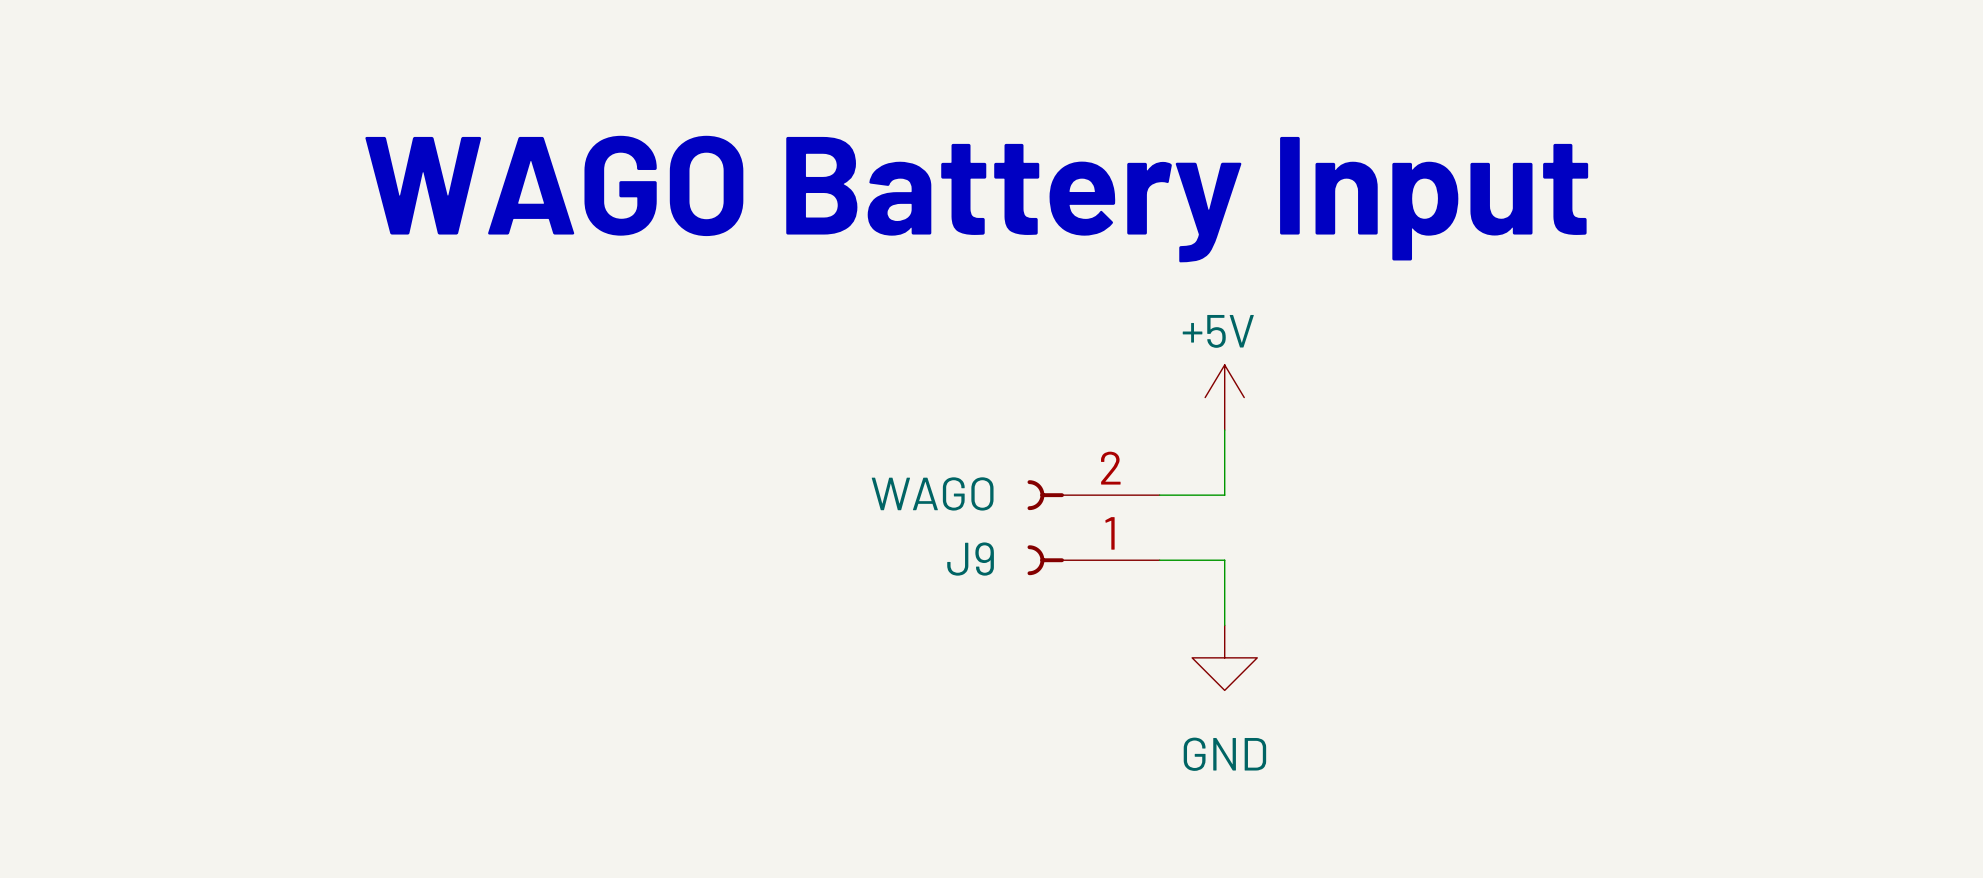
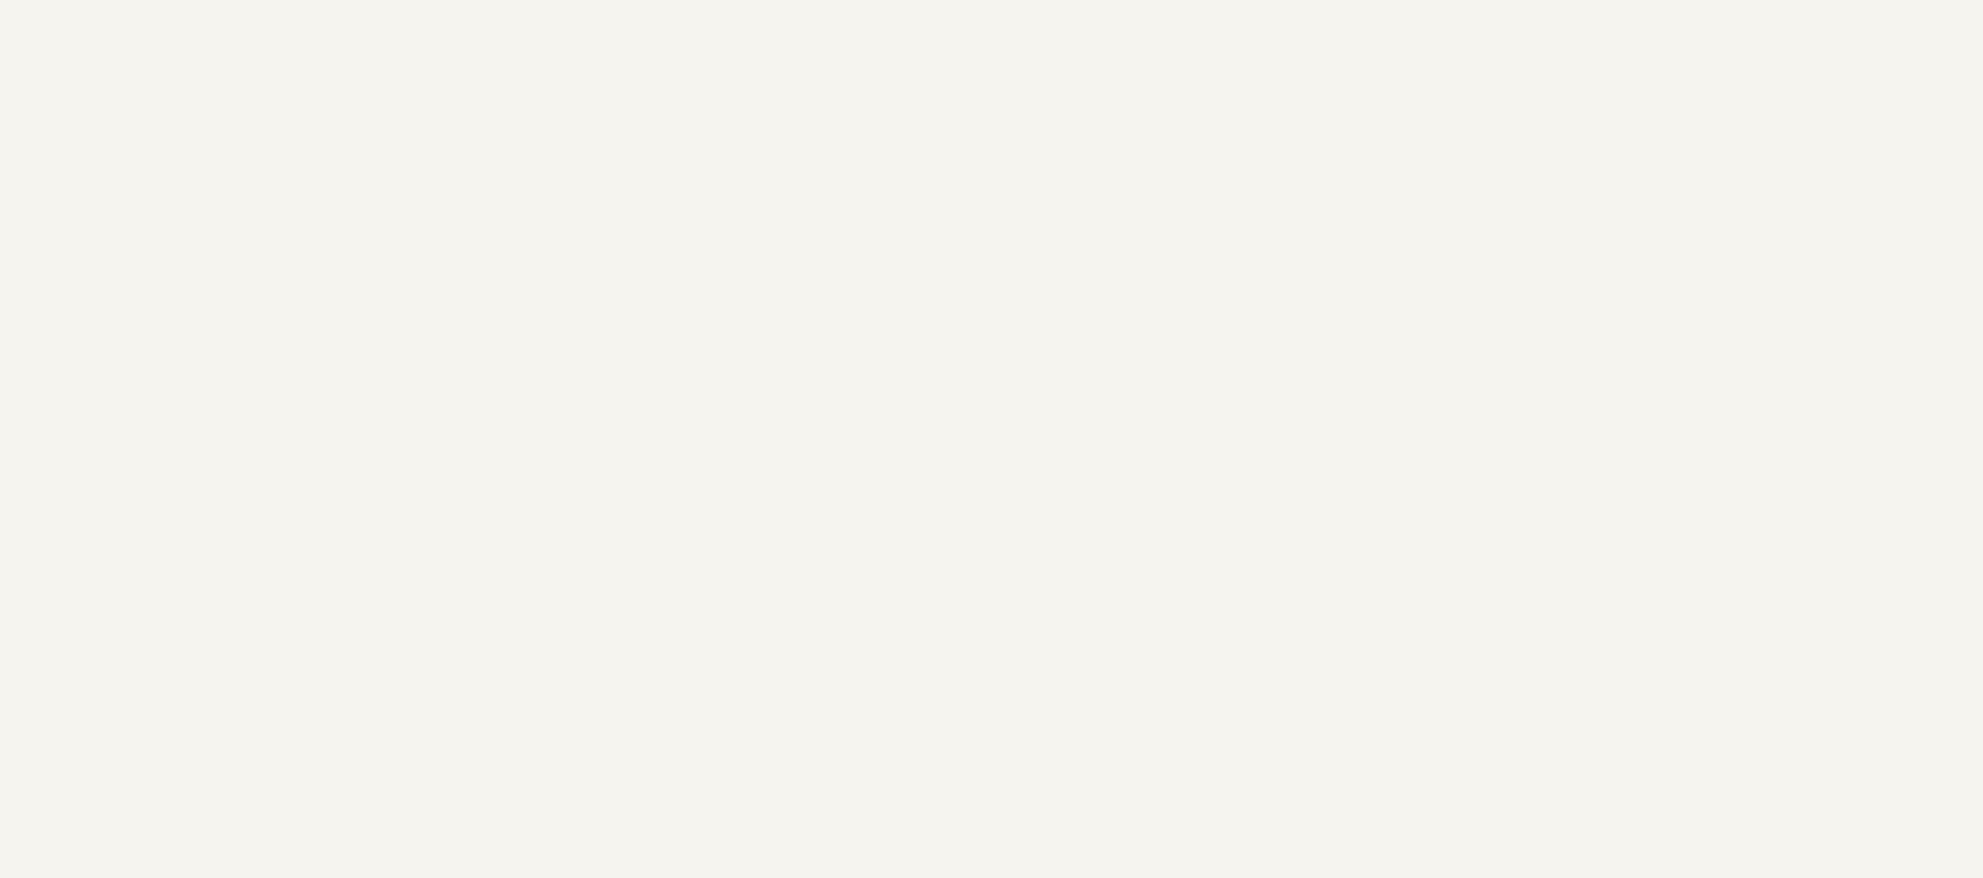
text: WAGO Battery Input (976, 199) -> none
power symbol: +5V (1224, 397) -> none
wire: (1224, 430) (1224, 495) (1159, 495) -> none
J9: WAGO (1093, 527) -> none
wire: (1159, 560) (1224, 560) (1224, 625) -> none
power symbol: GND (1224, 657) -> none

